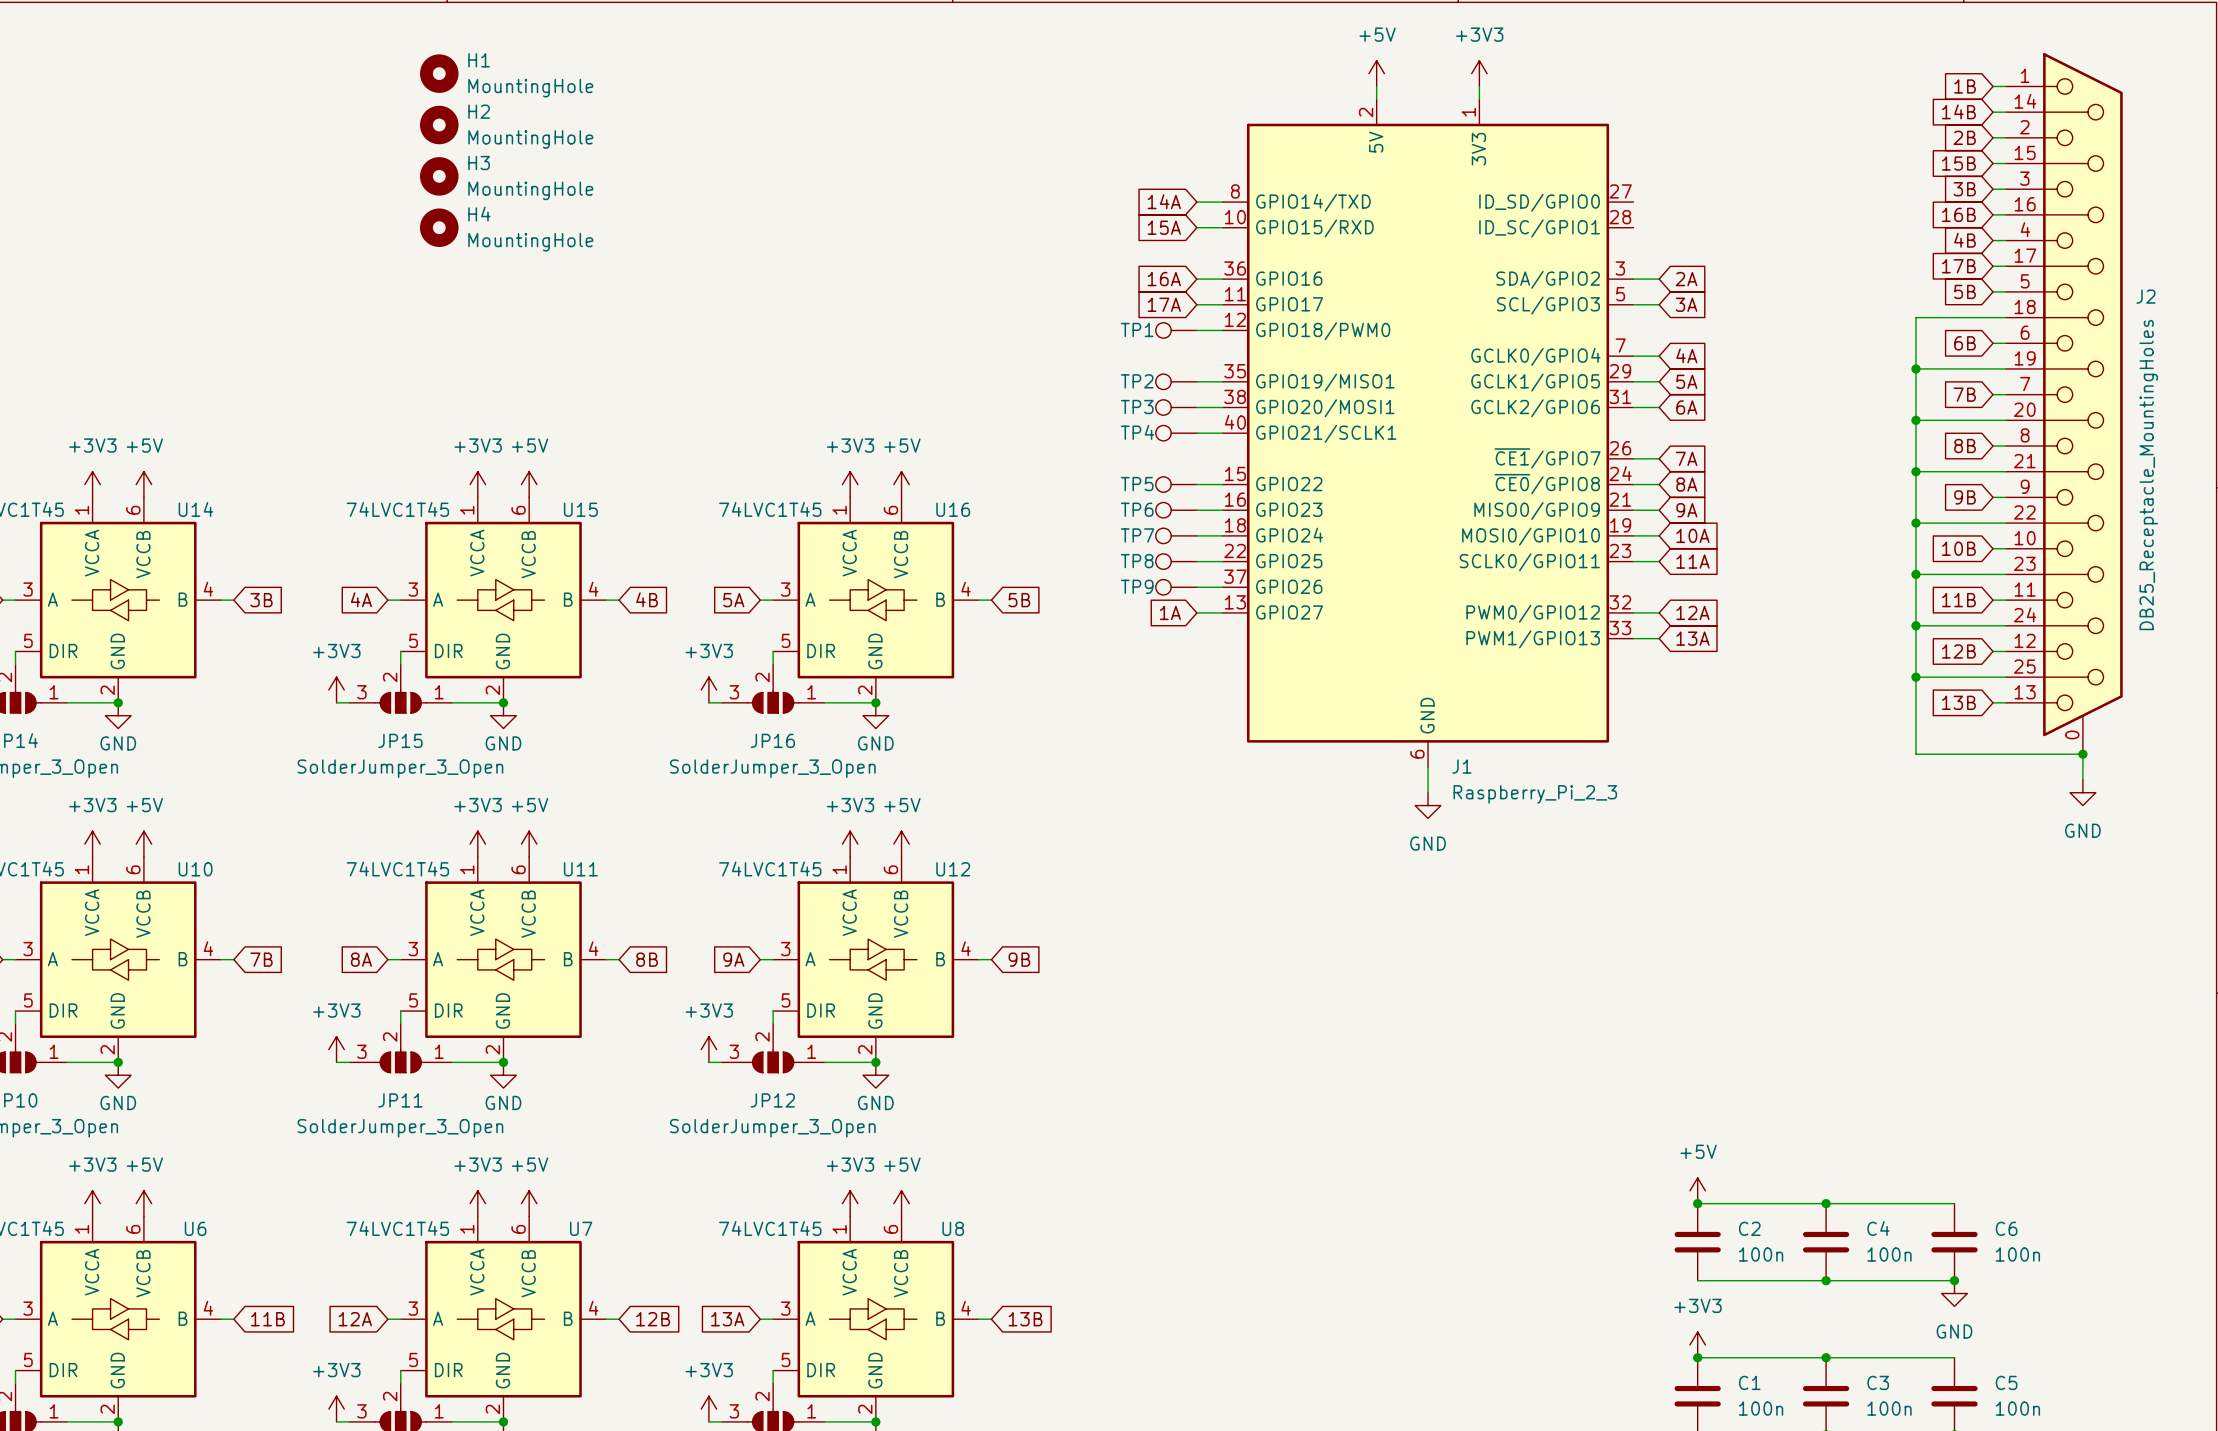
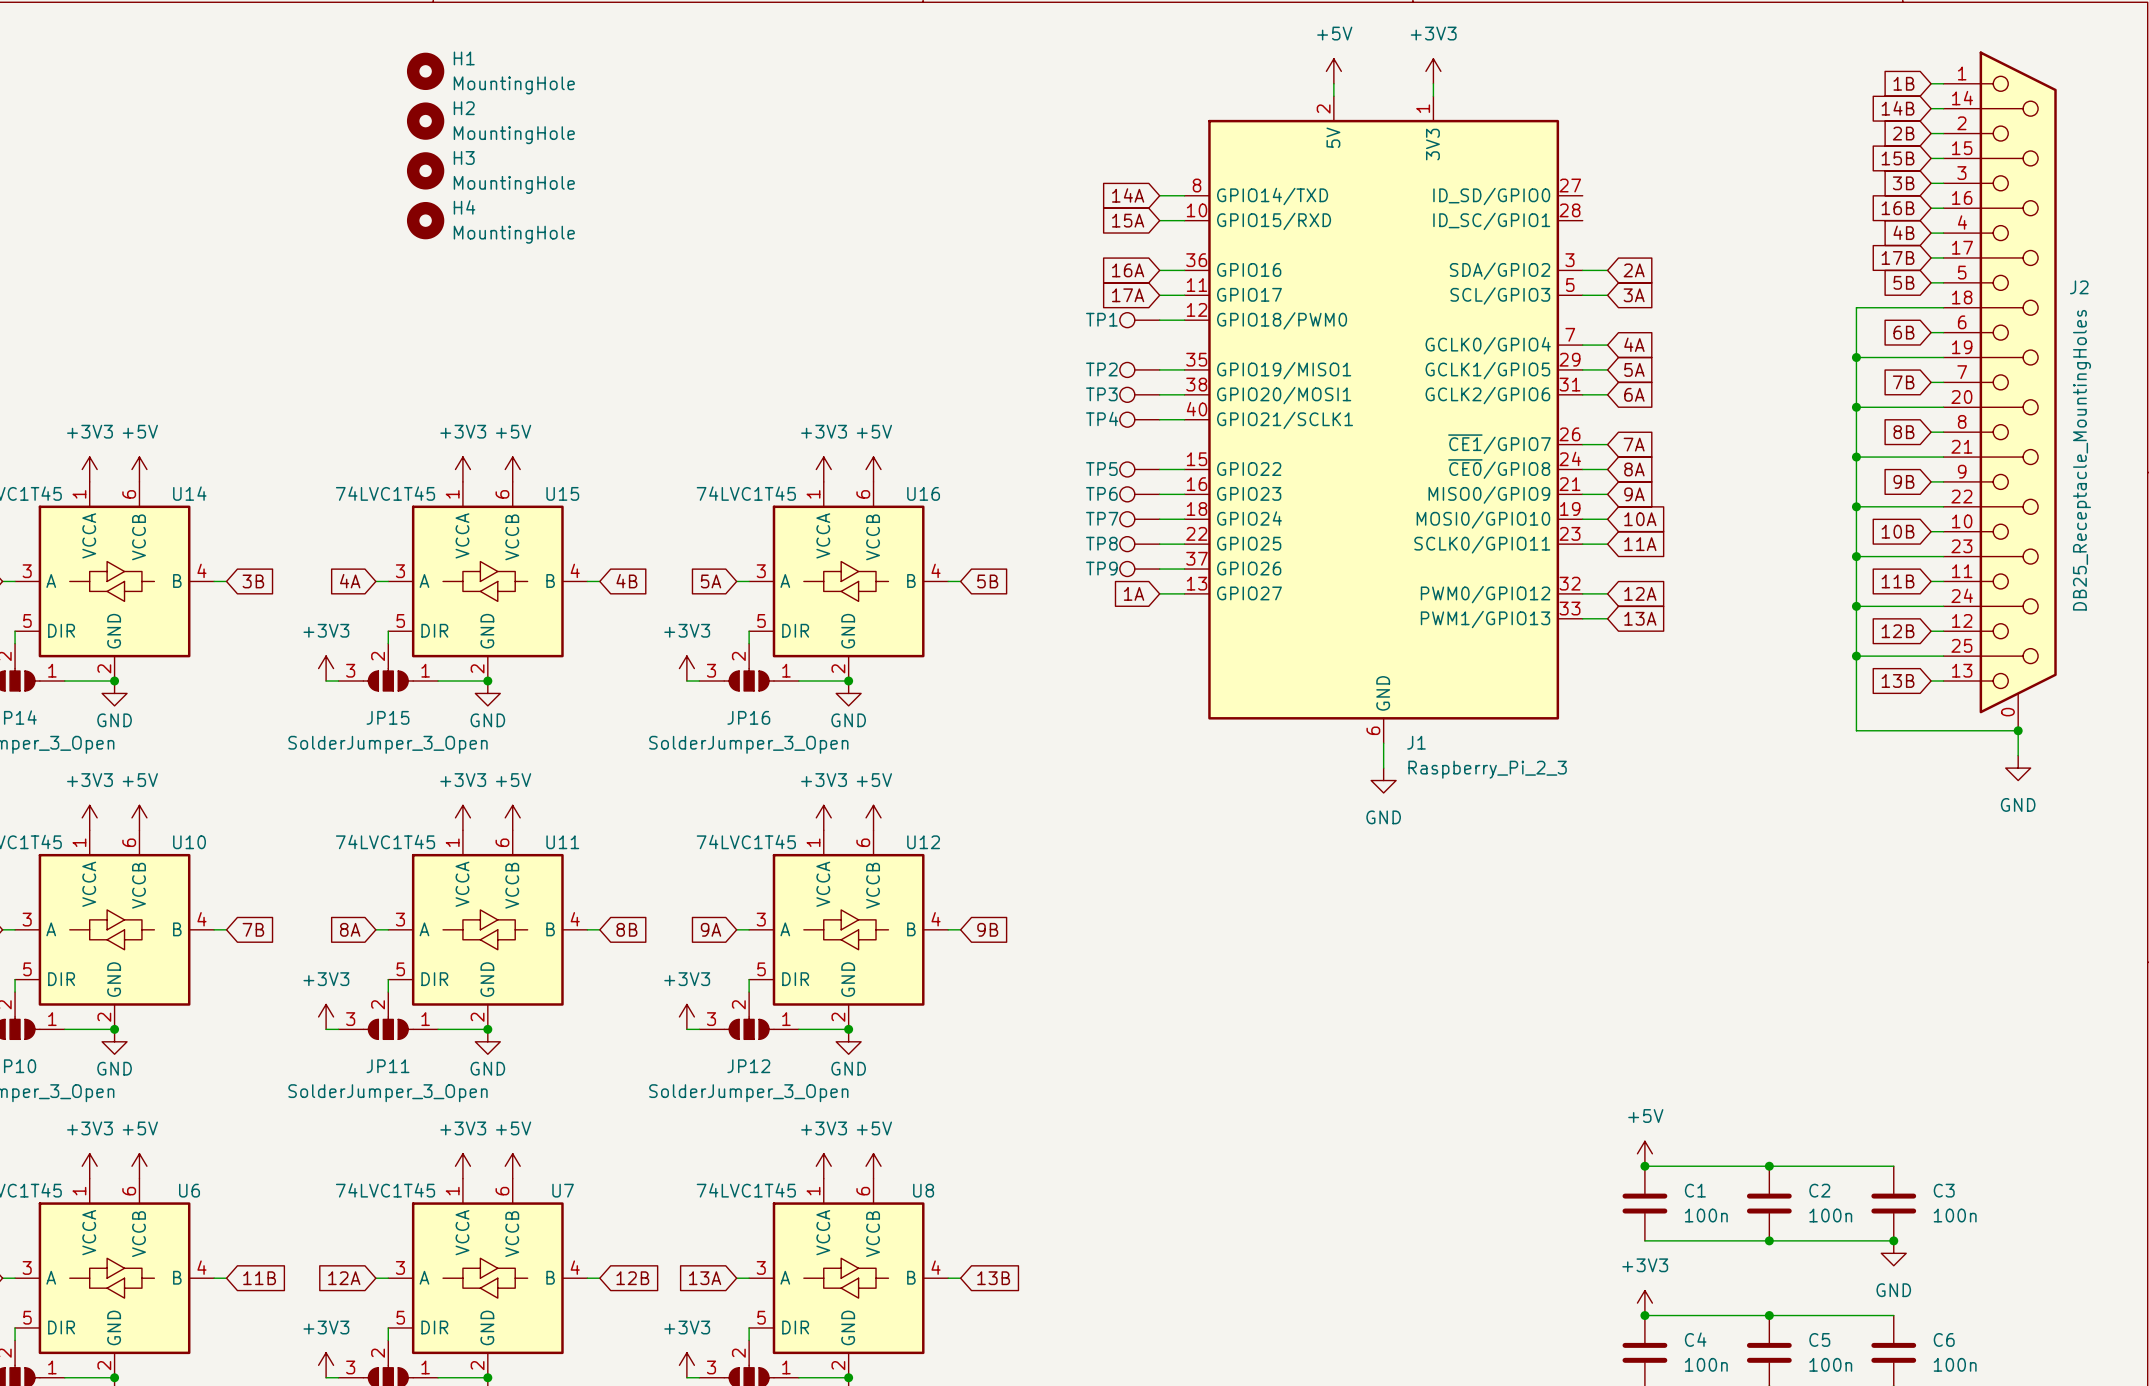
C2 name: C2 (1749, 1228) -> C1 (1695, 1190)
C4 name: C4 (1878, 1228) -> C2 (1819, 1190)
C6 name: C6 (2006, 1228) -> C3 (1944, 1190)
C1 name: C1 (1749, 1382) -> C4 (1695, 1339)
C3 name: C3 (1878, 1382) -> C5 (1819, 1339)
C5 name: C5 (2006, 1382) -> C6 (1944, 1339)

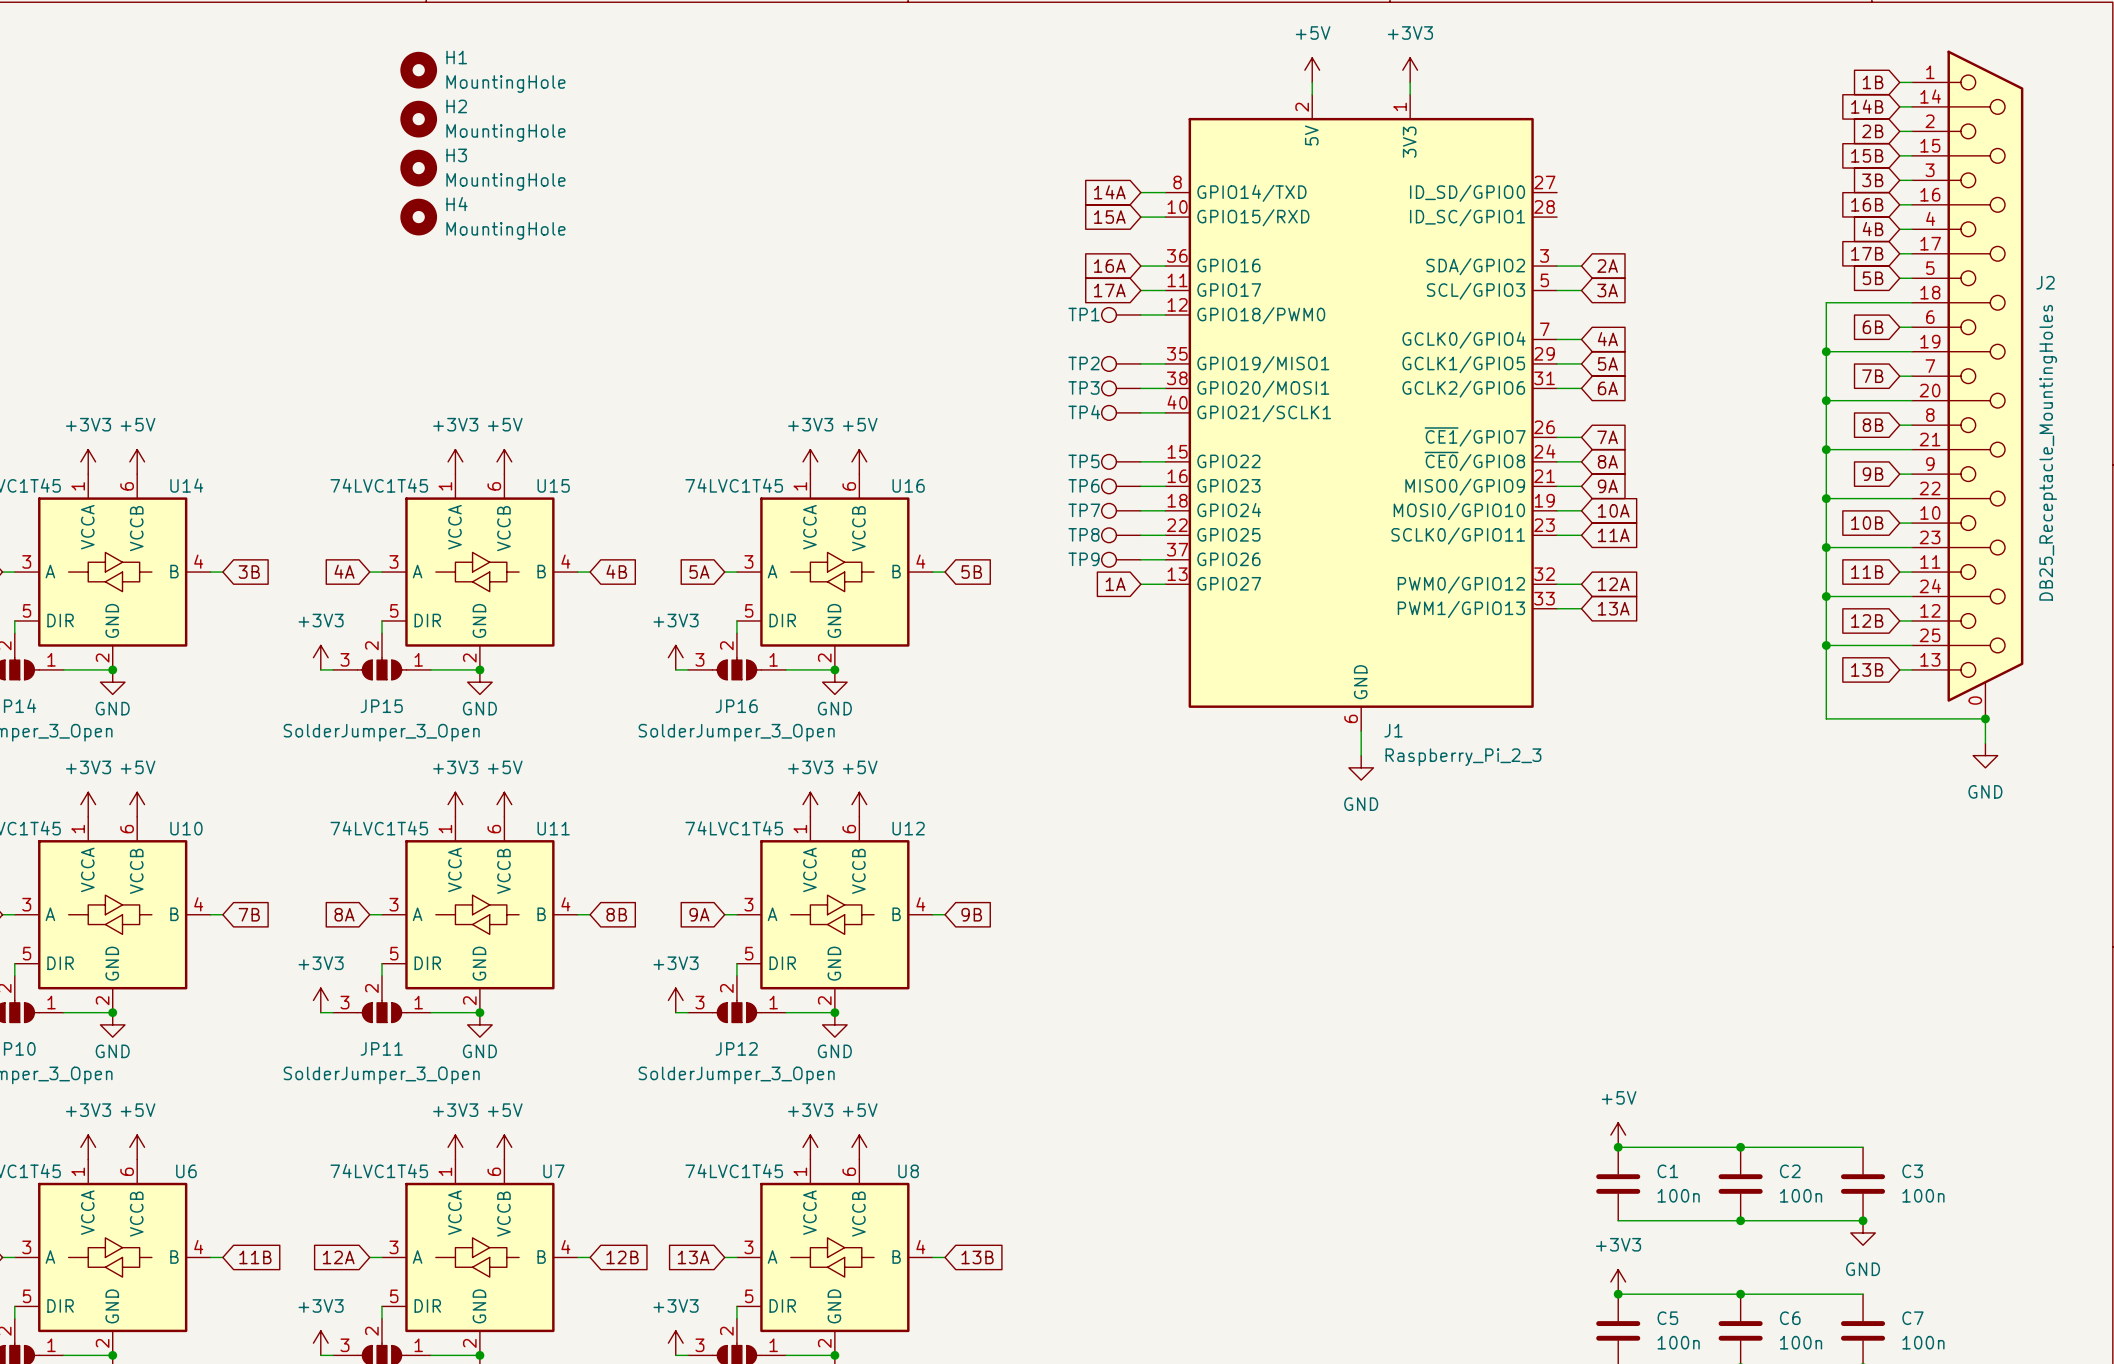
C4 name: C4 (1695, 1339) -> C5 (1667, 1318)
C5 name: C5 (1819, 1339) -> C6 (1790, 1318)
C6 name: C6 (1944, 1339) -> C7 (1912, 1318)

